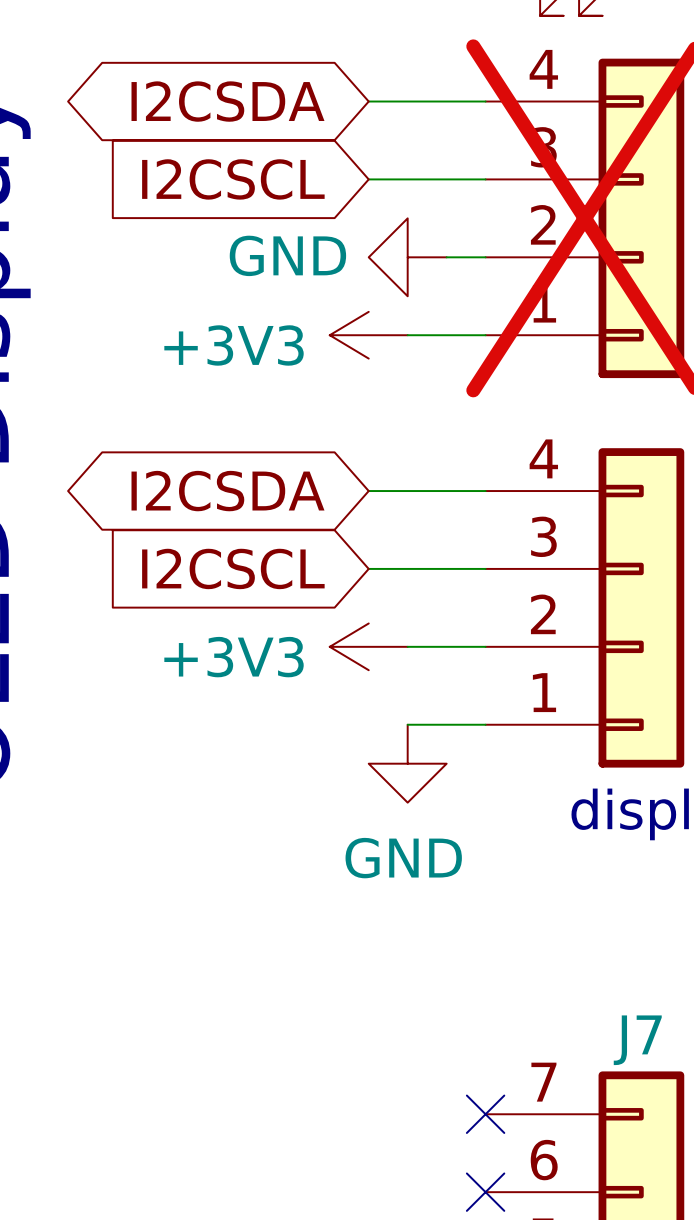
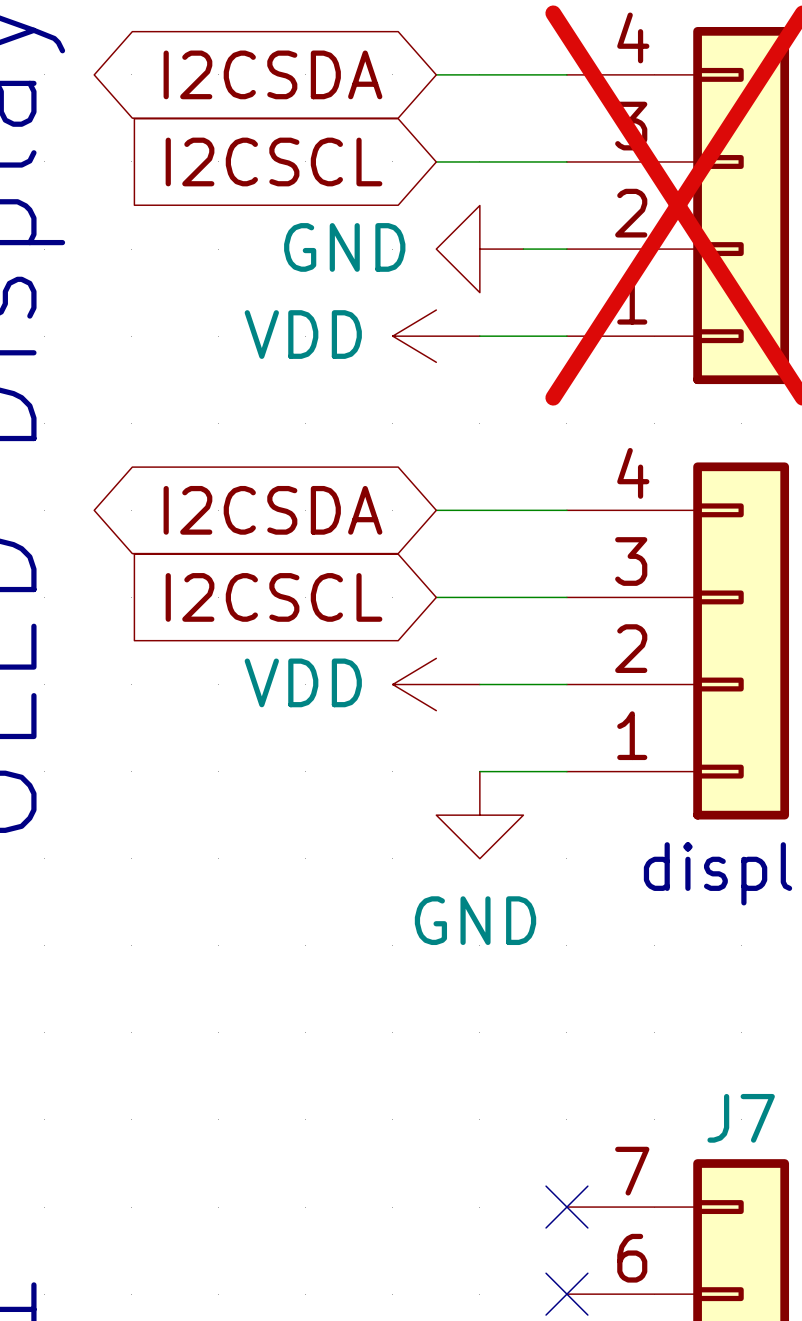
power symbol: +3V3 (368, 335) -> VDD (436, 336)
power symbol: +3V3 (368, 646) -> VDD (436, 684)

